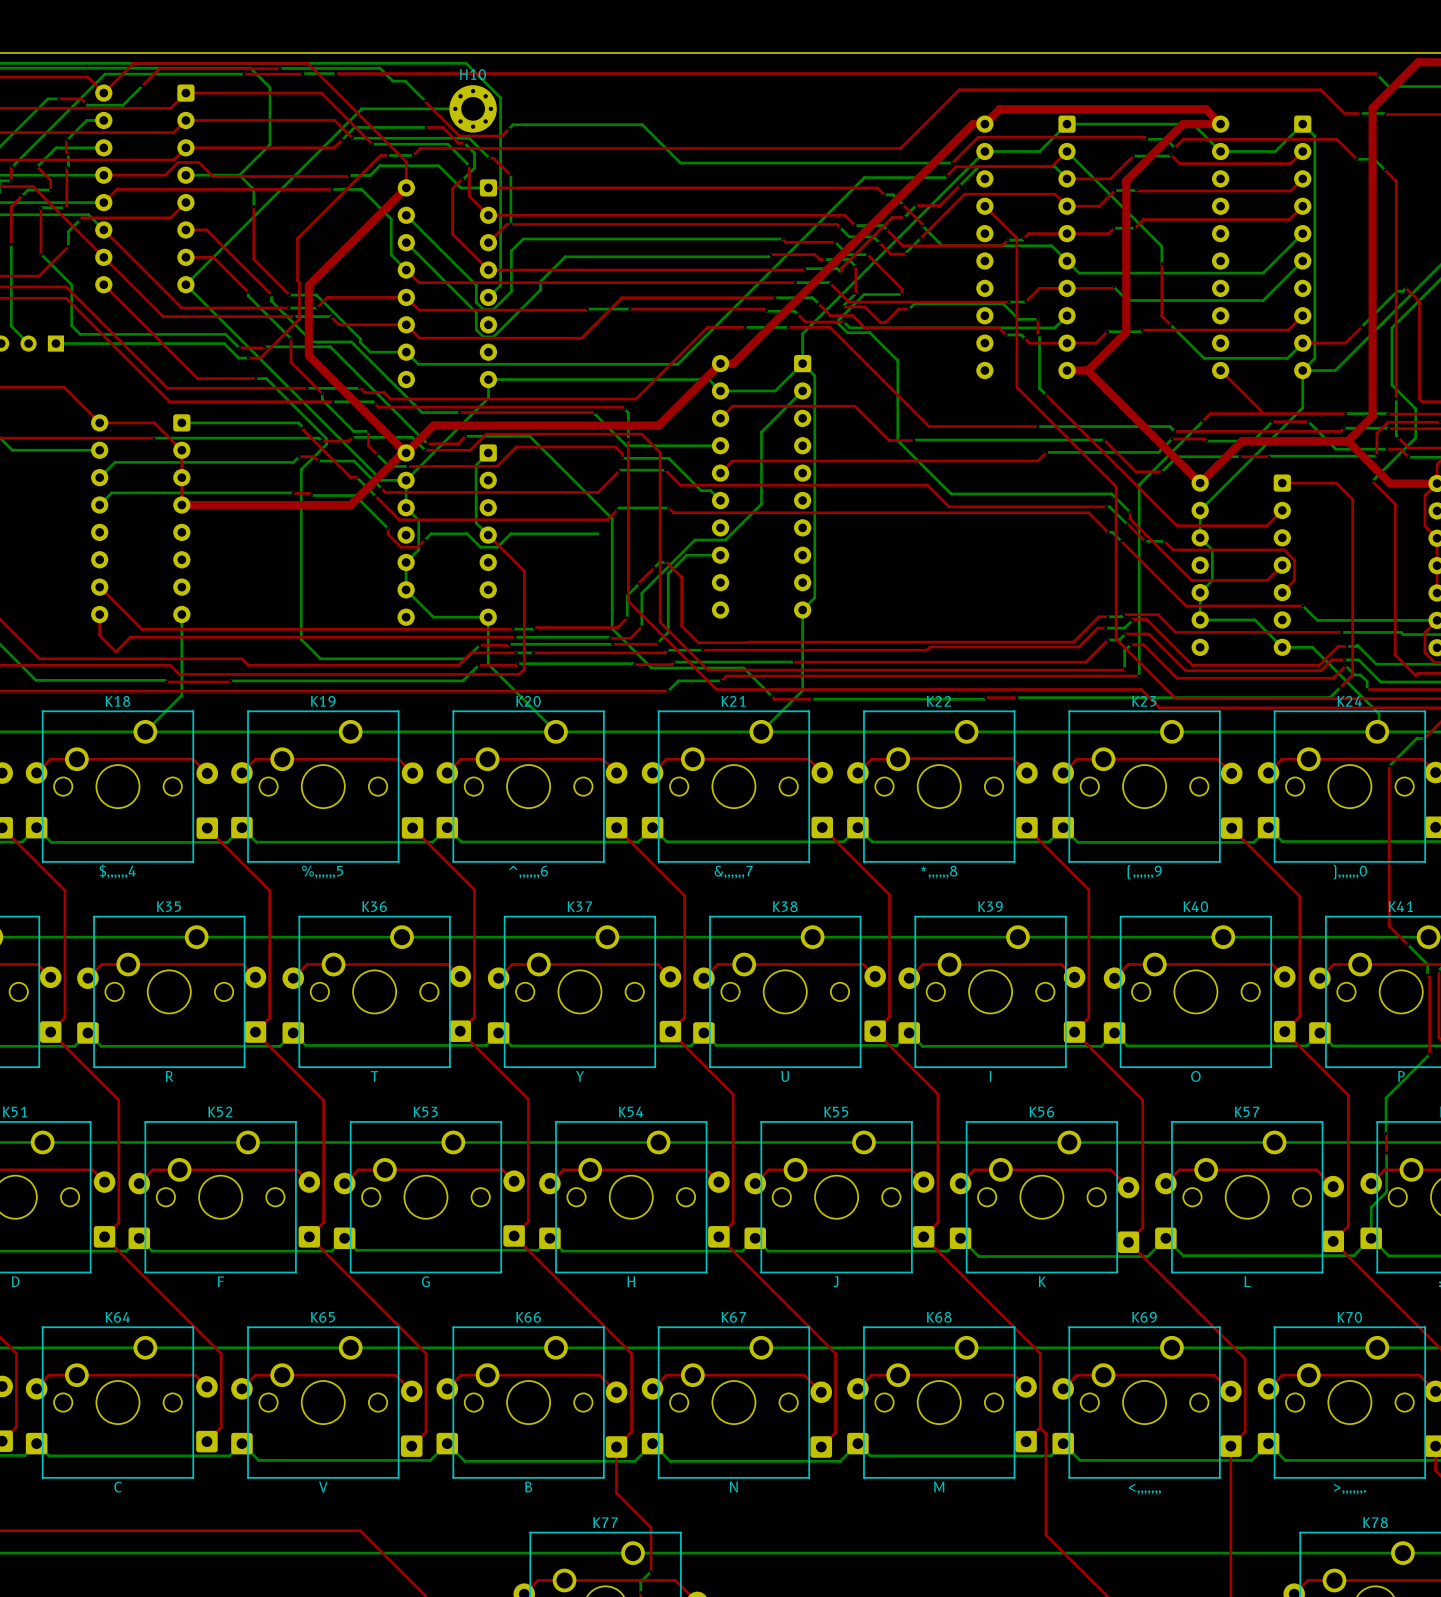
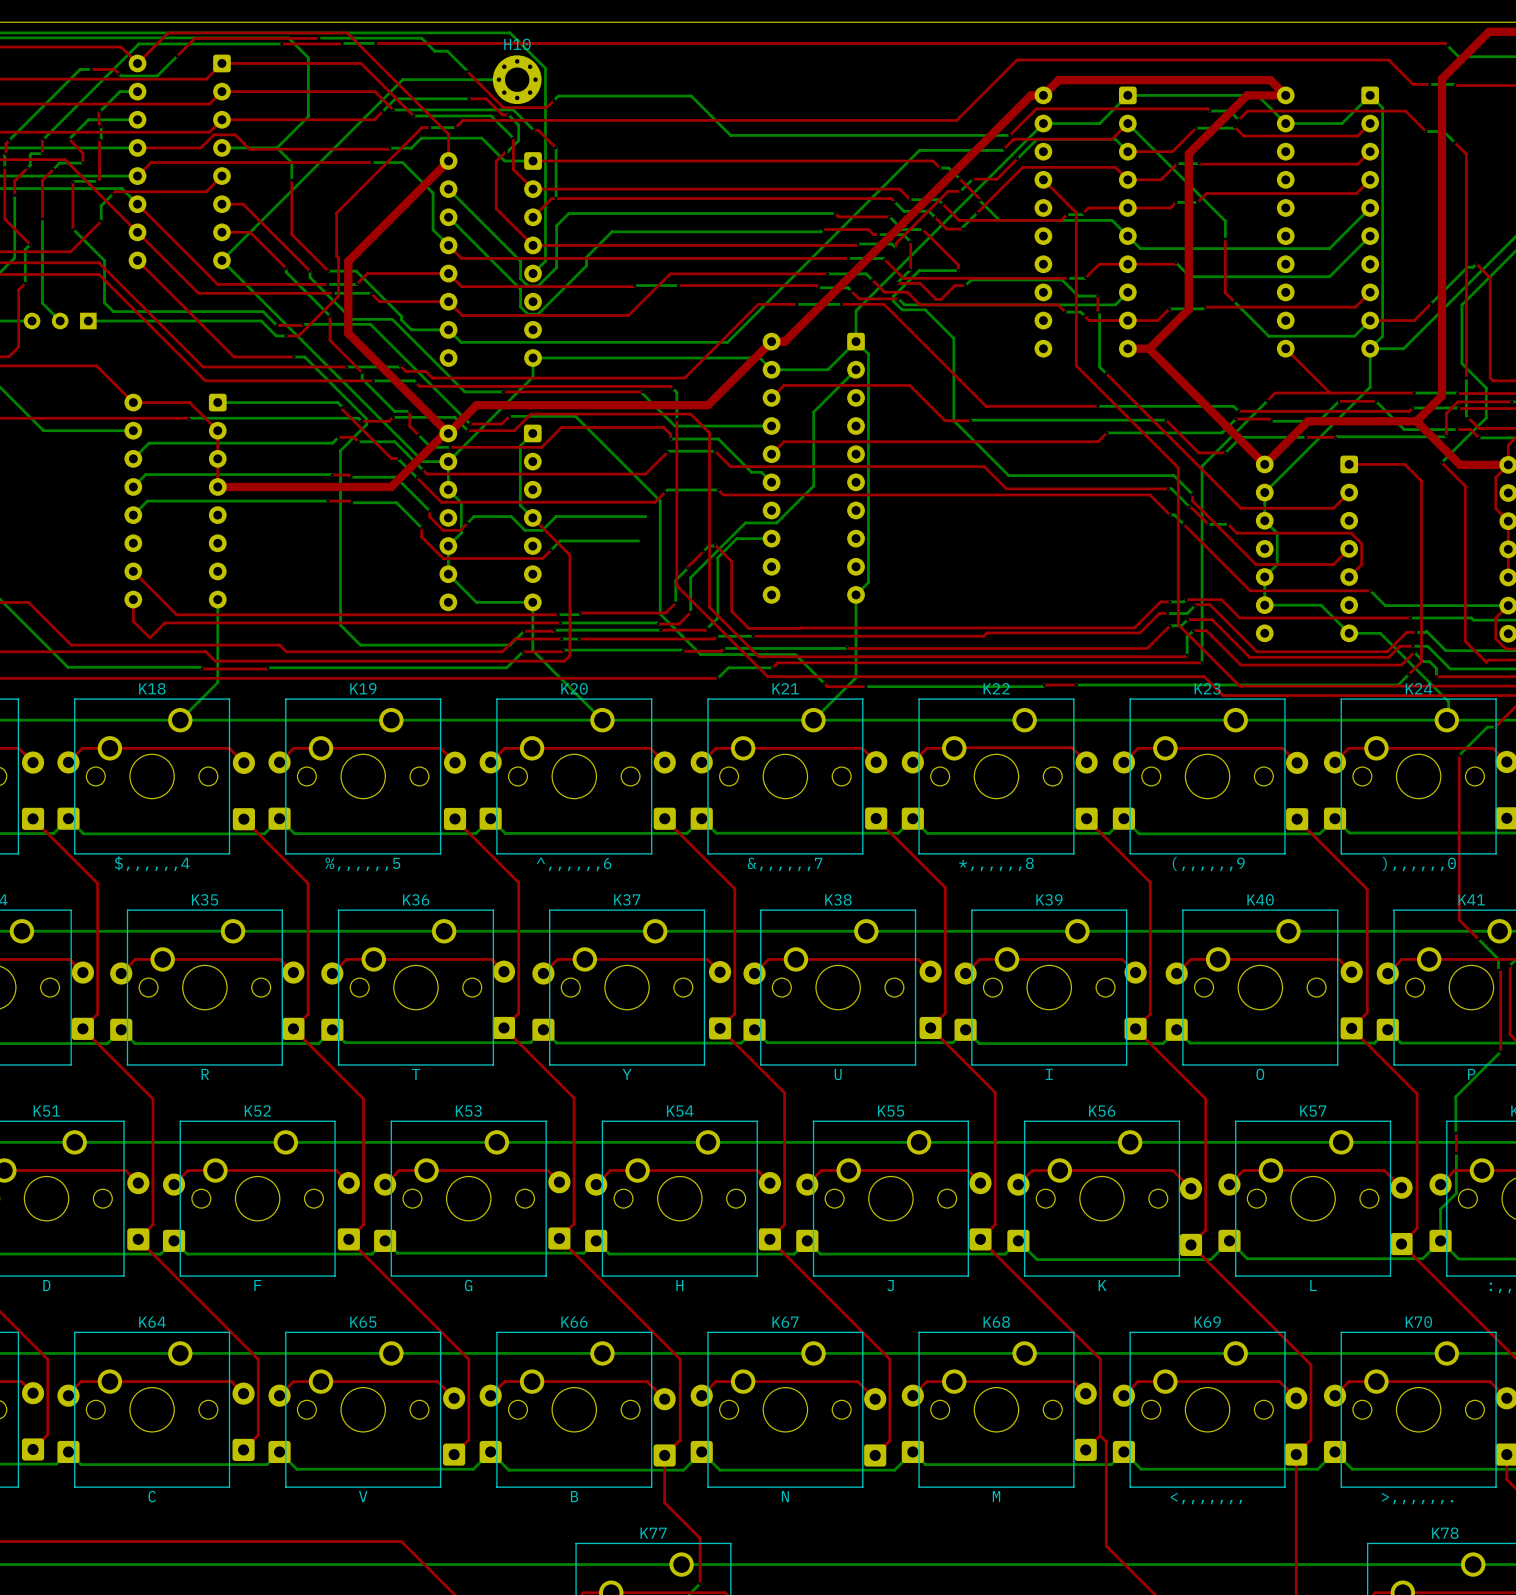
bottom track: none -> (328, 501) (147, 501) (133, 515)
top track: none -> (328, 501) (349, 501) (351, 502)
via: none -> (328, 501)
bottom track: none -> (351, 502) (396, 502) (421, 527)
via: none -> (351, 502)
top track: none -> (421, 527) (421, 537) (443, 558) (542, 558) (551, 550)
via: none -> (421, 527)
bottom track: none -> (638, 540) (560, 540) (551, 550)
via: none -> (551, 550)

